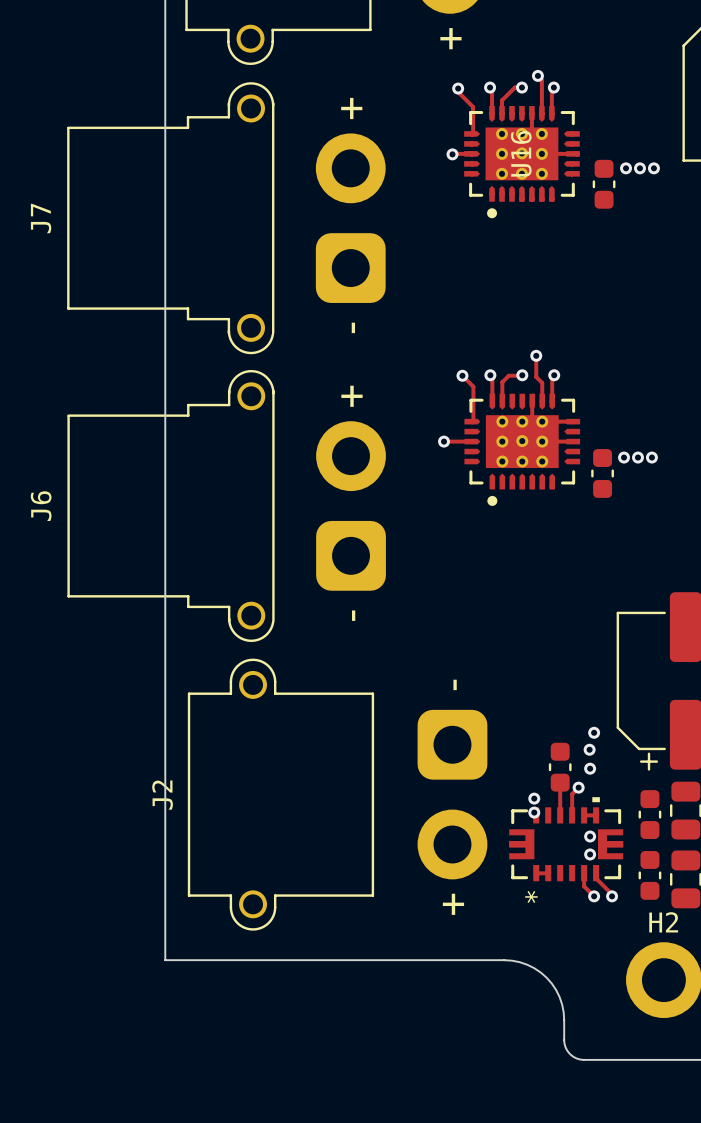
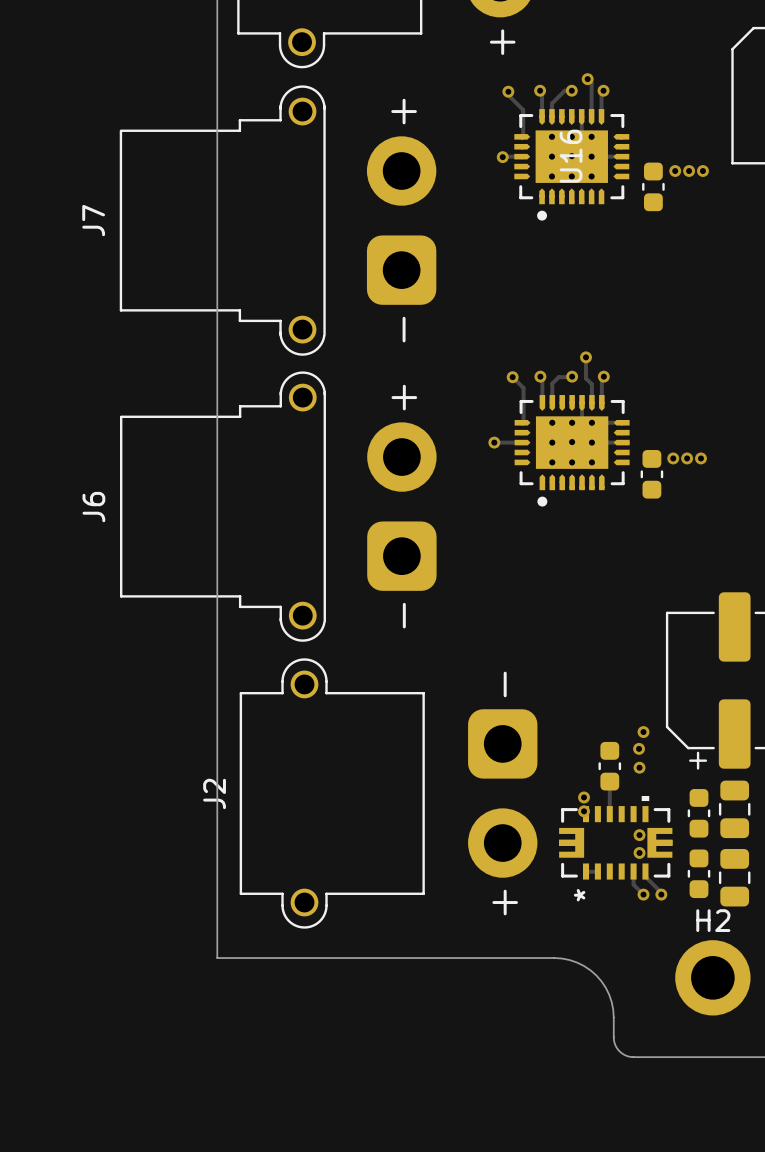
track: (578, 787) (572, 794) (572, 815) -> none
via: (578, 787) -> none
track: (584, 815) (596, 815) -> none

